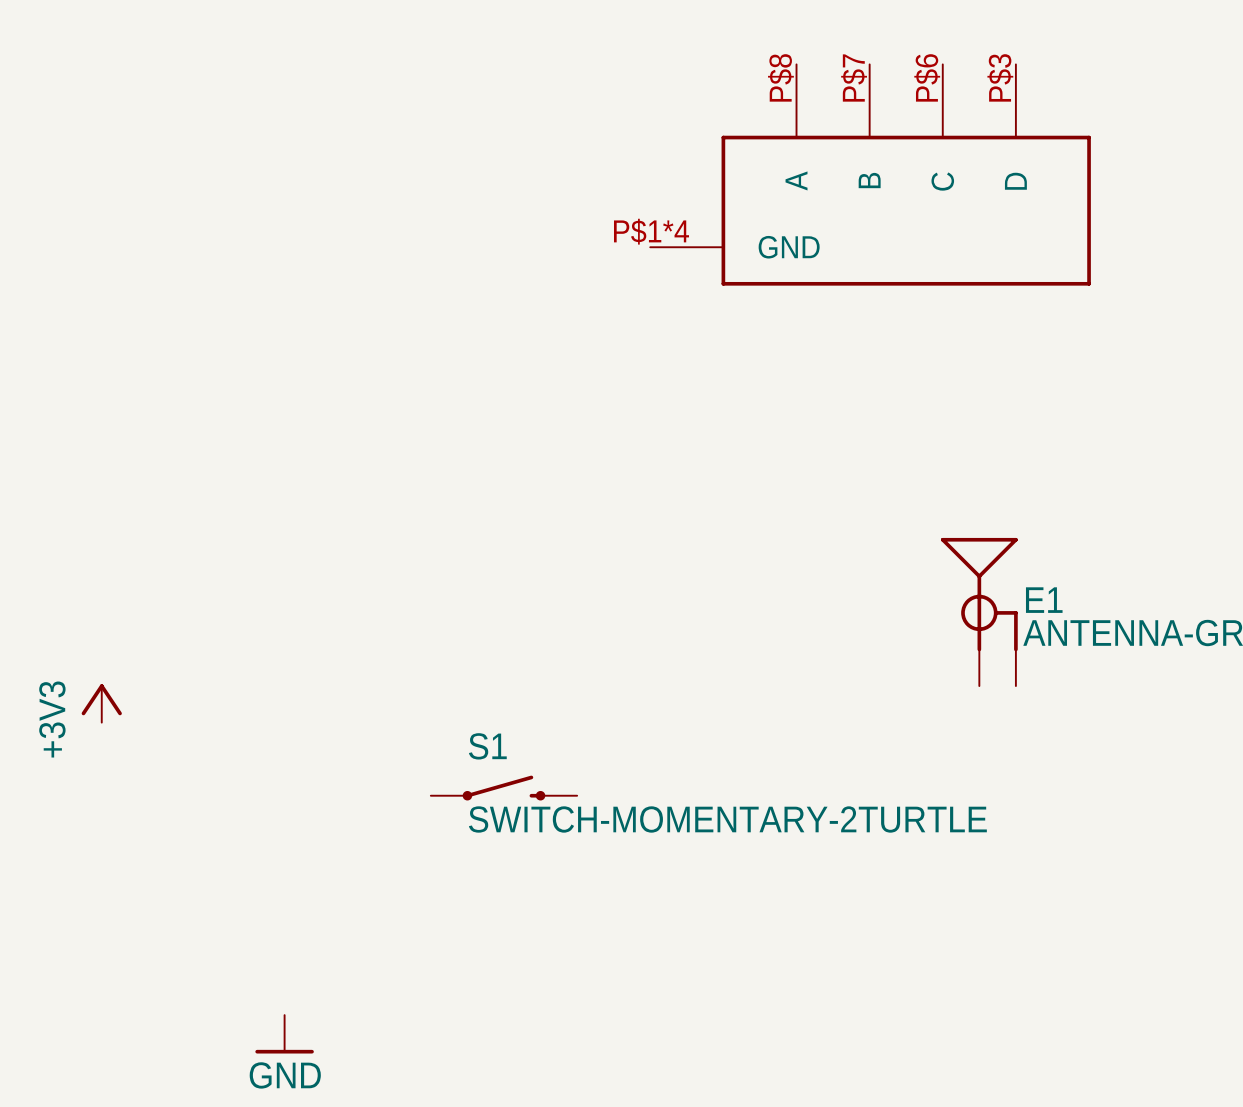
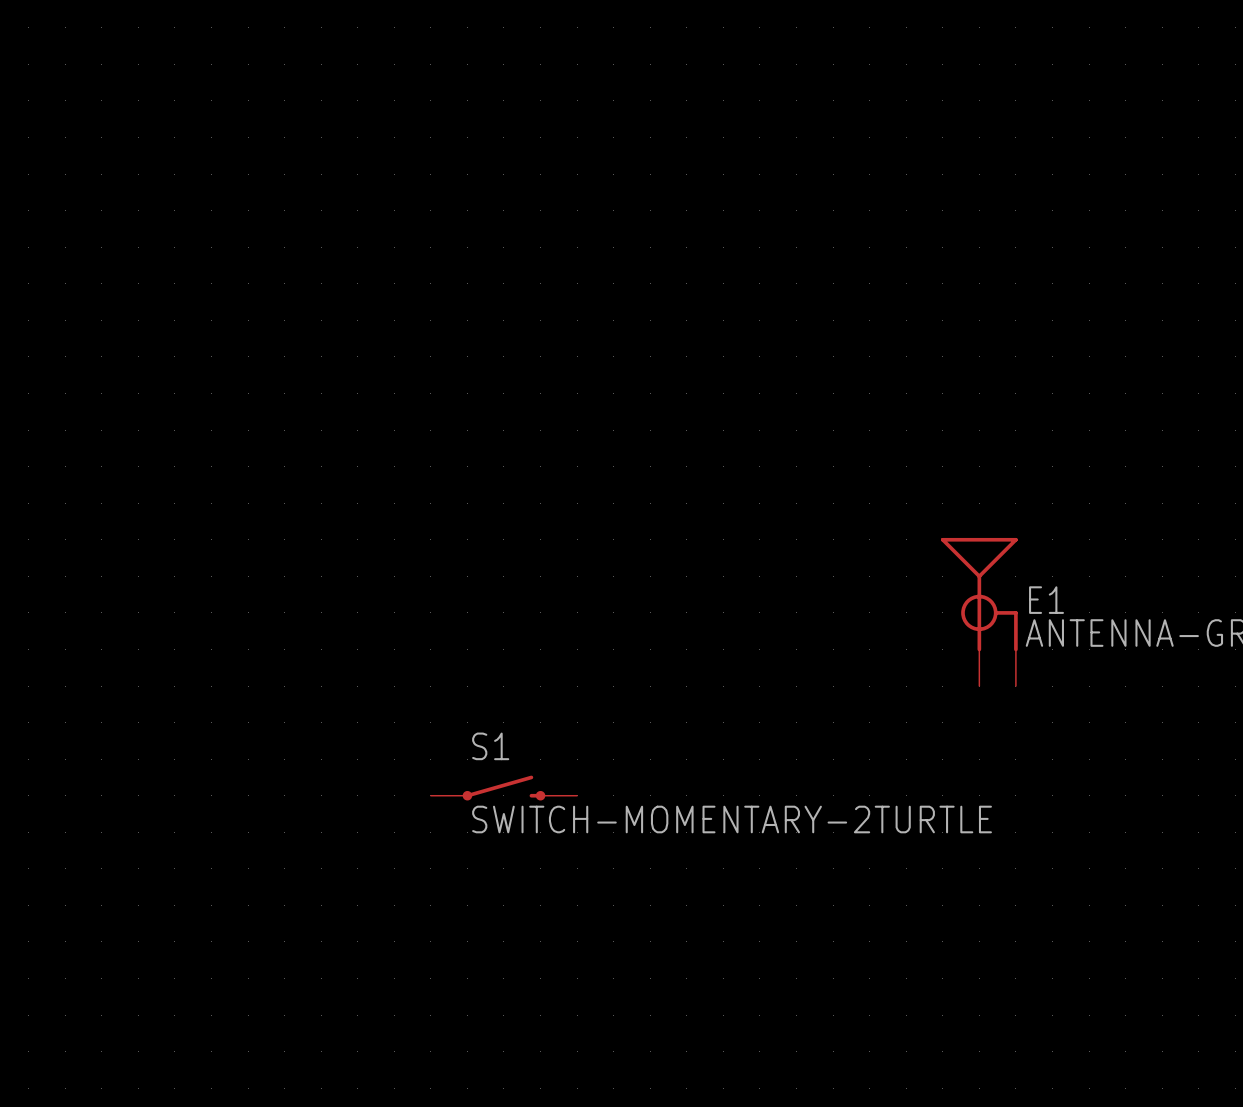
part: (870, 175) -> none
power symbol: +3V3 (101, 703) -> none
power symbol: GND (284, 1034) -> none

